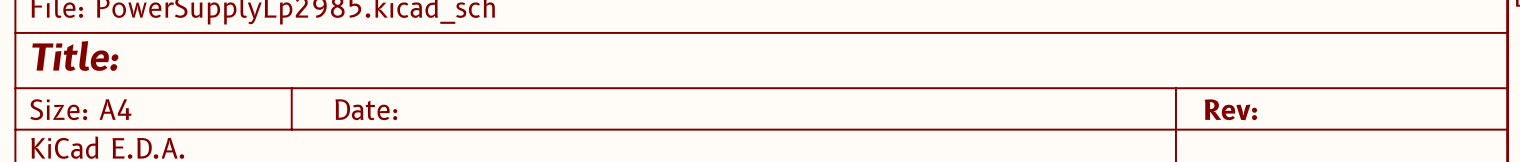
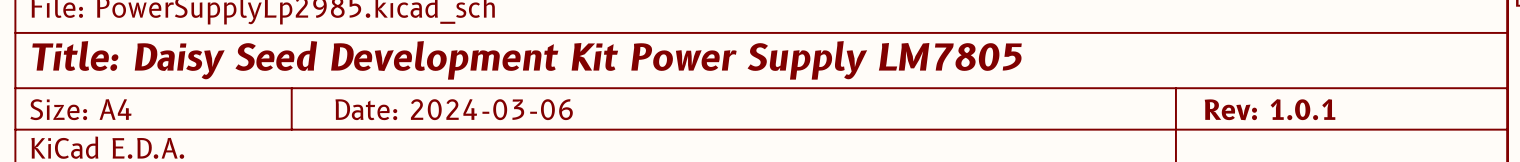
title block: Title: (75, 55) -> Title: Daisy Seed Development Kit Power Supply LM7805 (527, 60)
title block: Date: (366, 109) -> Date: 2024-03-06 (454, 109)
title block: Rev: (1230, 109) -> Rev: 1.0.1 (1270, 109)

